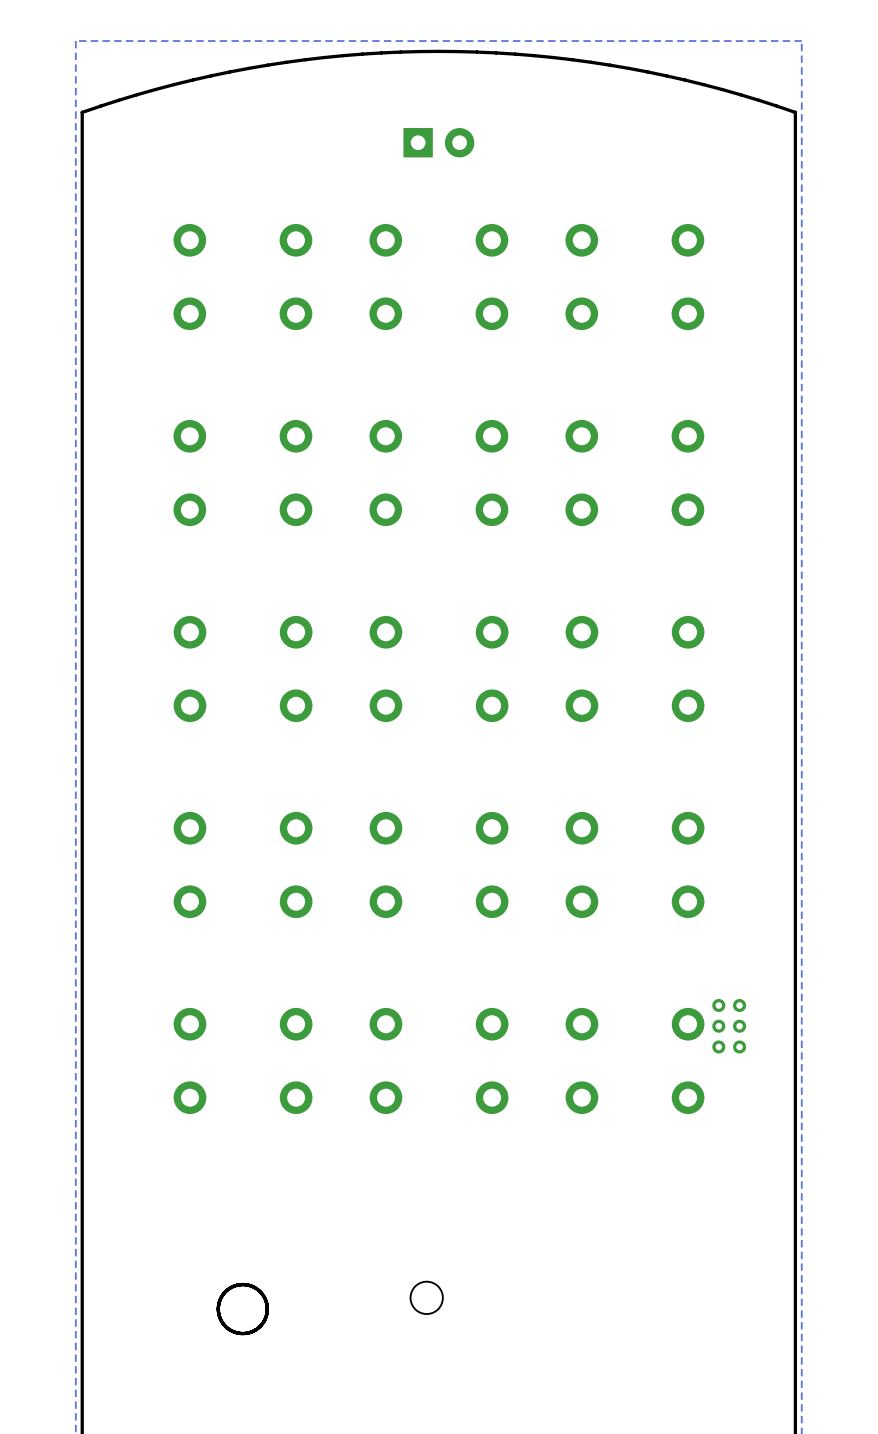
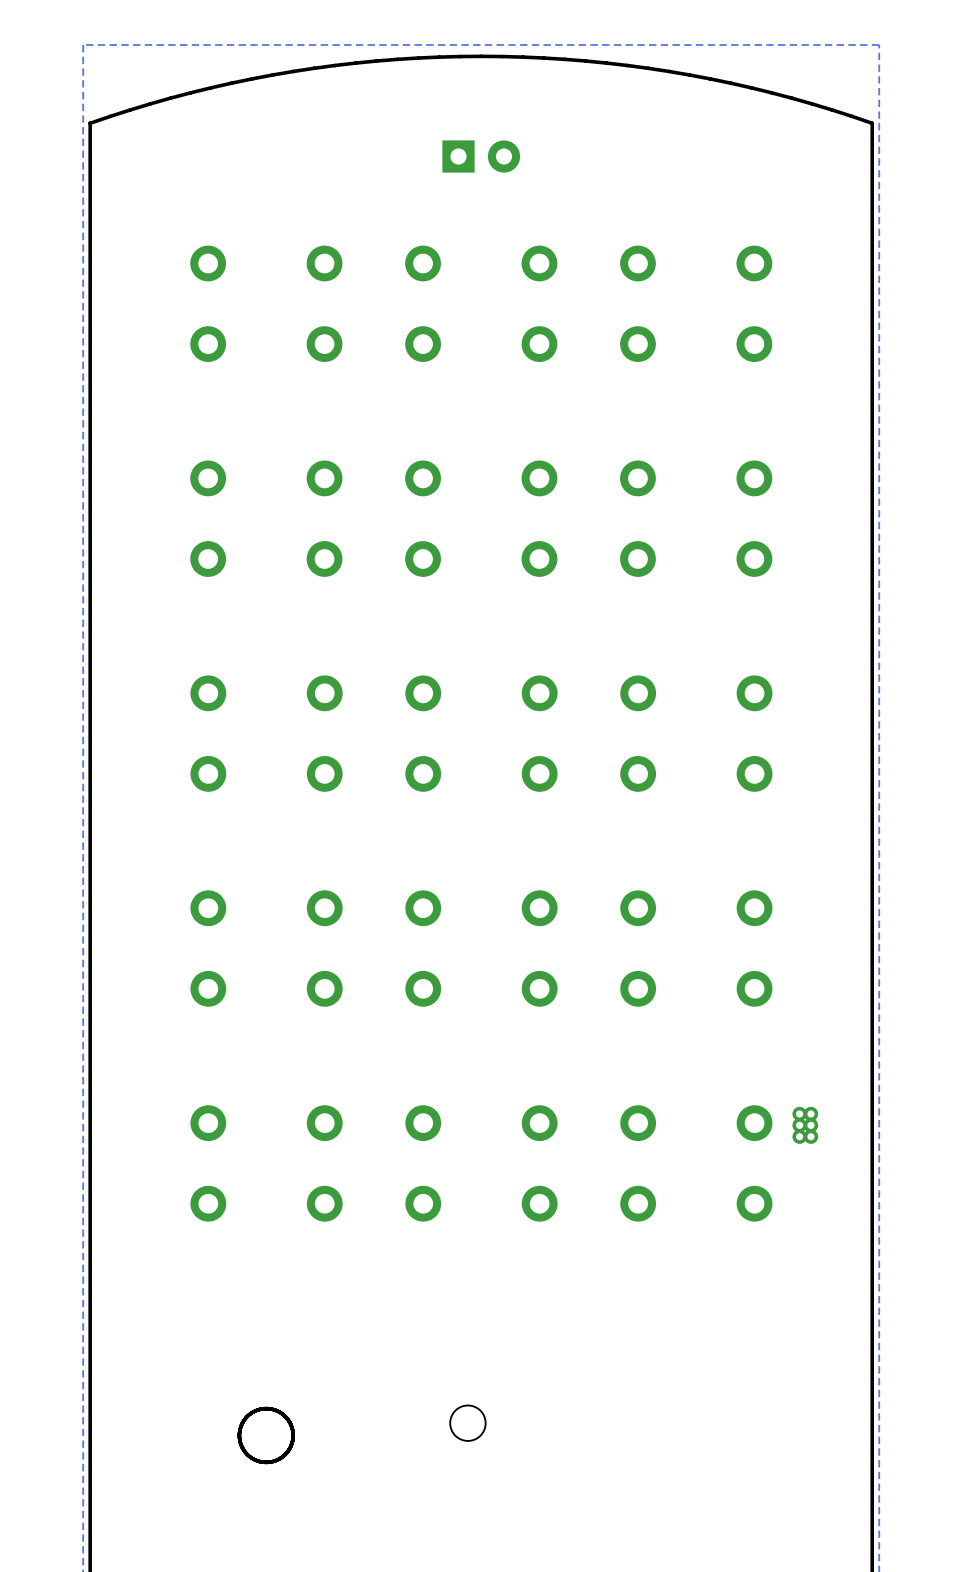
via: (718, 1005) -> none
via: (739, 1005) -> none
via: none -> (799, 1113)
via: none -> (810, 1113)
via: (718, 1026) -> none
via: none -> (799, 1125)
via: none -> (799, 1136)
via: none -> (810, 1136)
via: (718, 1046) -> none
via: (739, 1046) -> none

